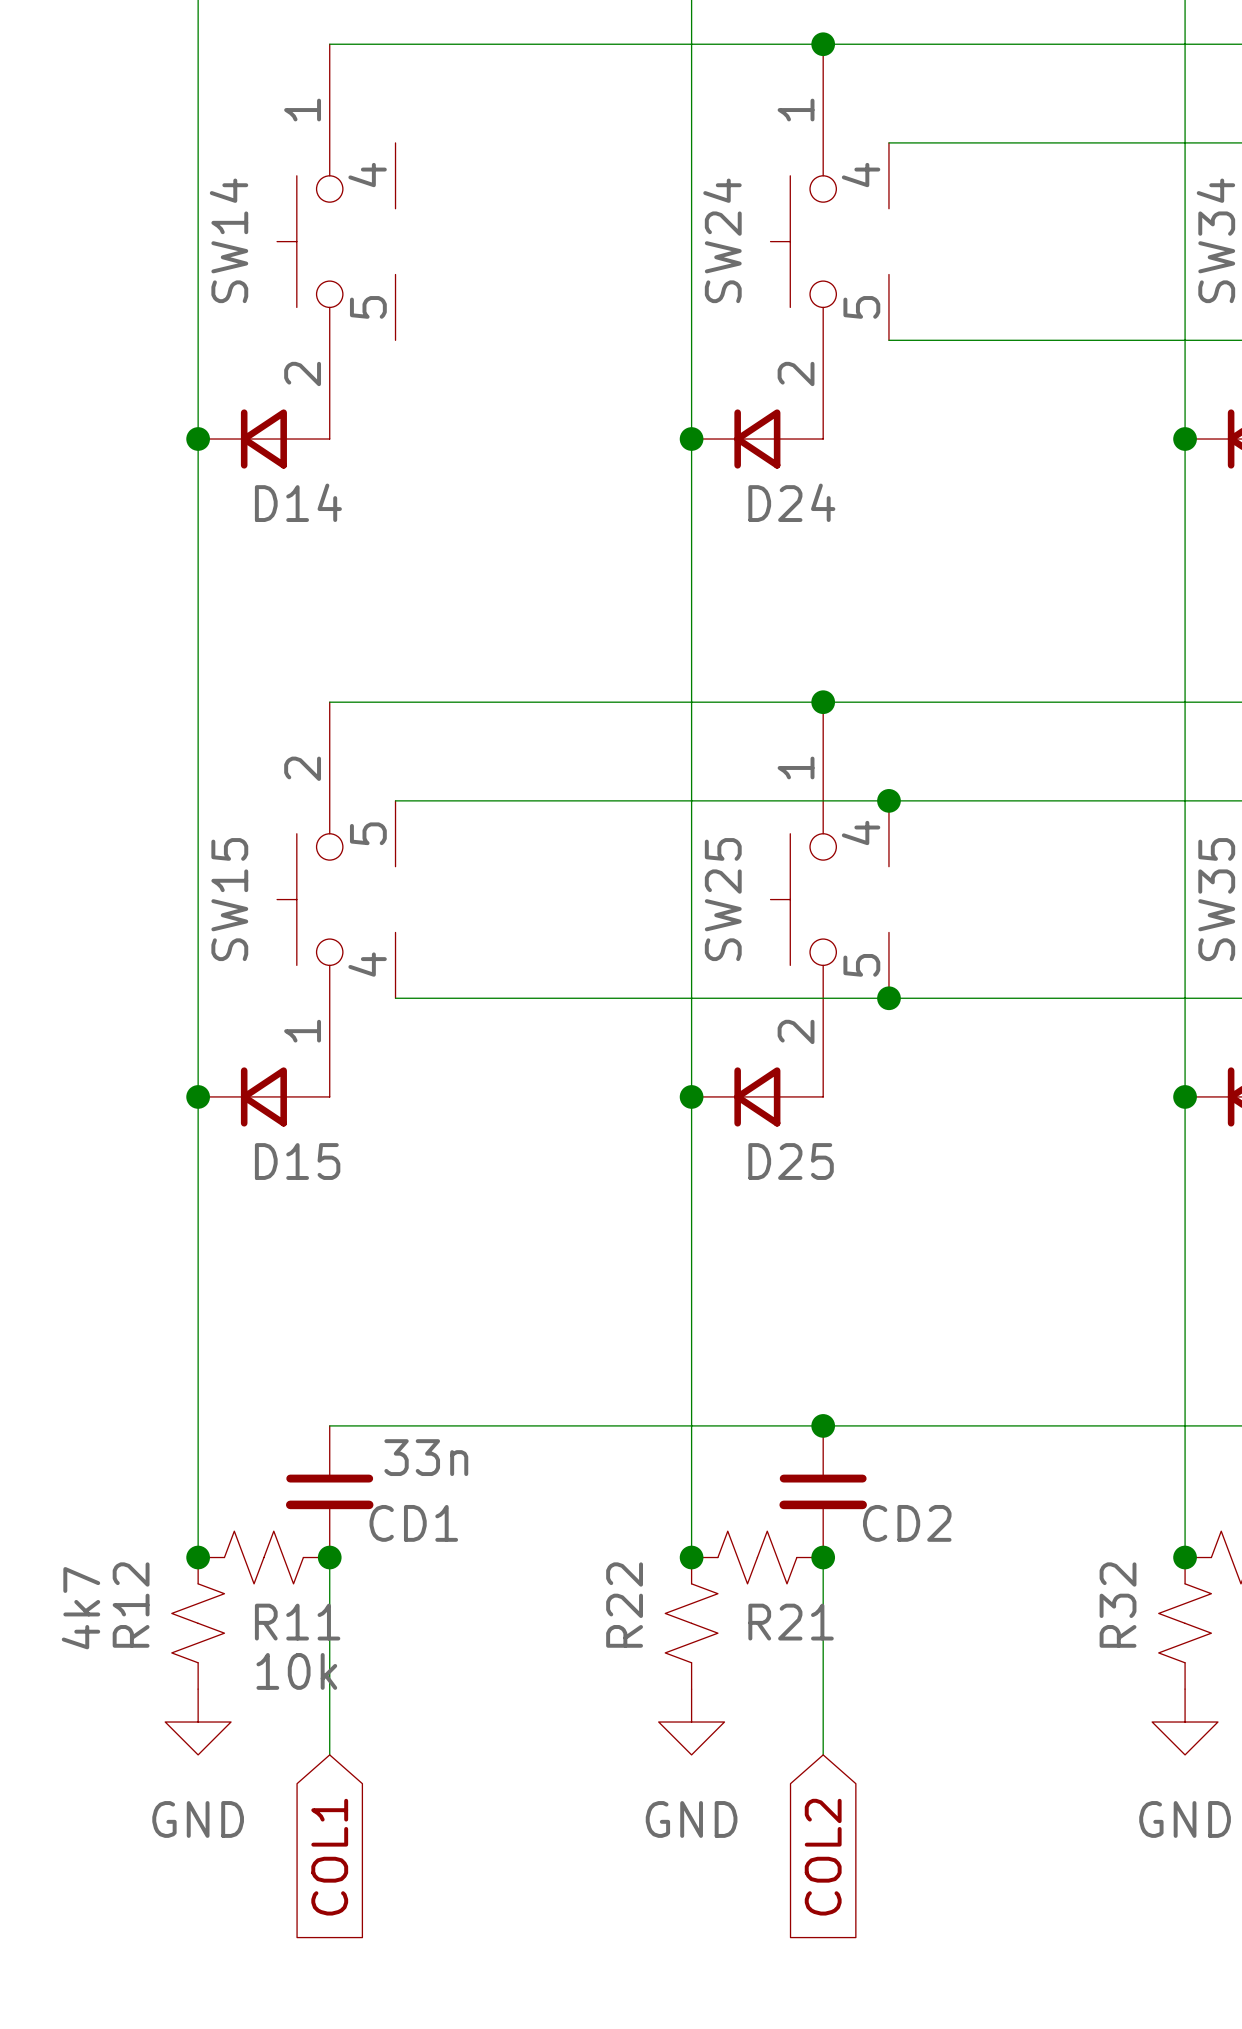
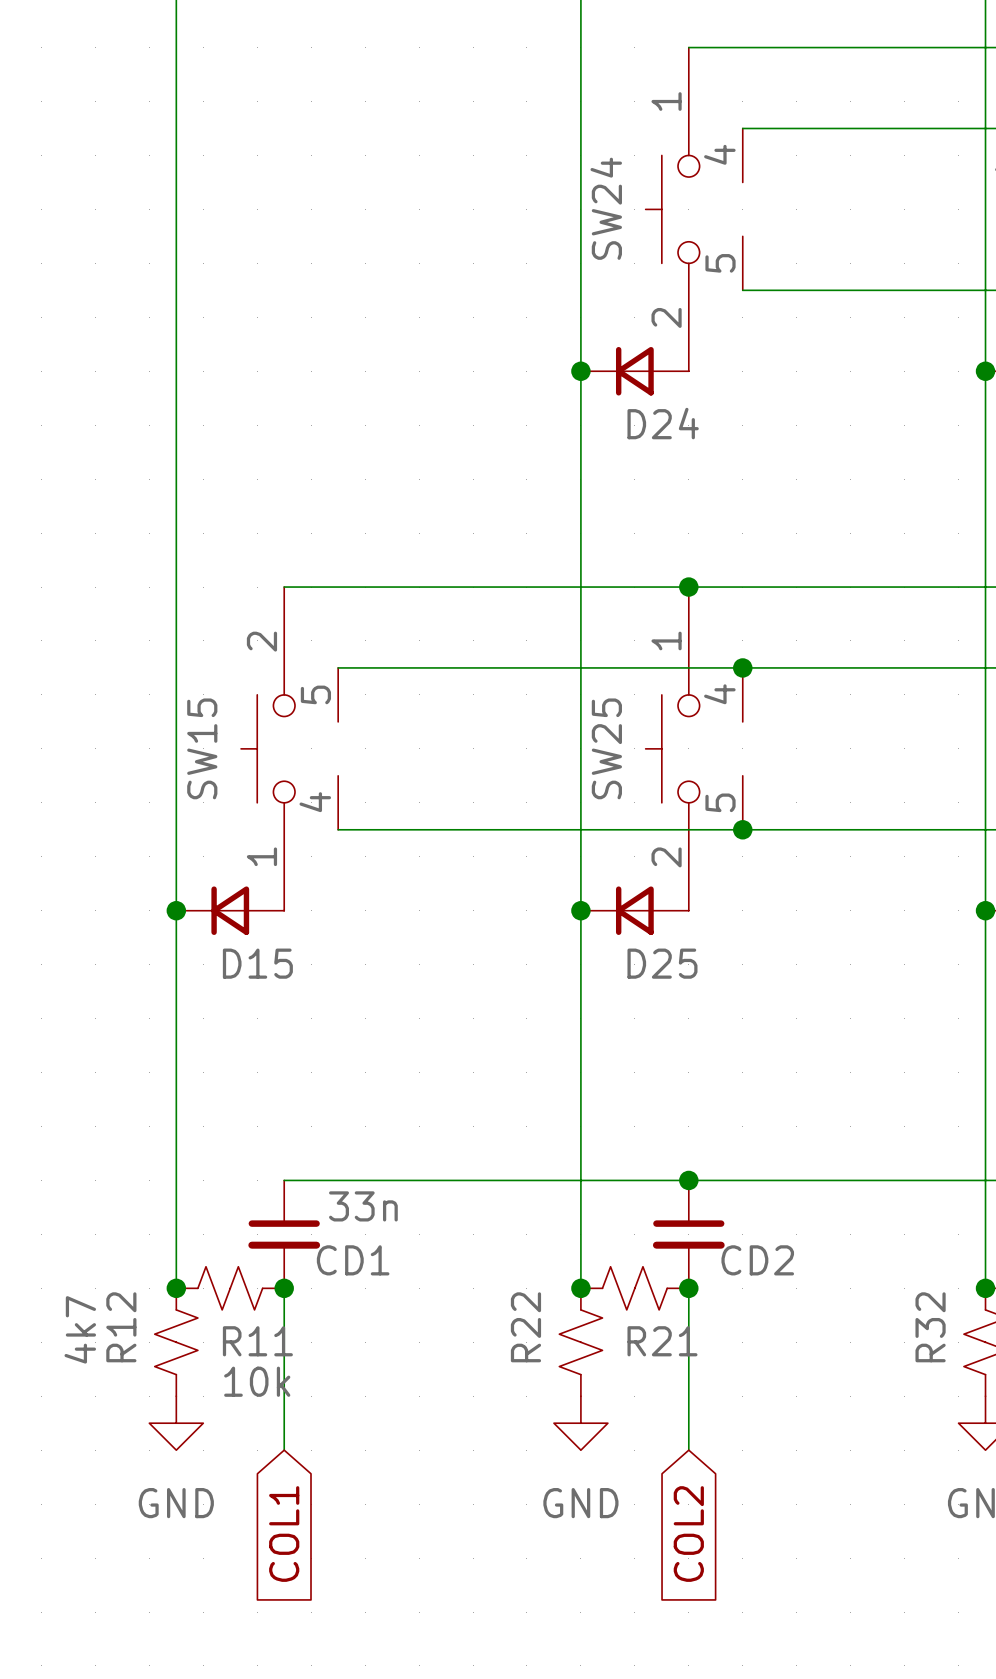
wire: (329, 44) (823, 44) -> none
junction: (823, 44) -> none
SW14: (336, 241) -> none
junction: (198, 439) -> none
D14: (263, 439) -> none

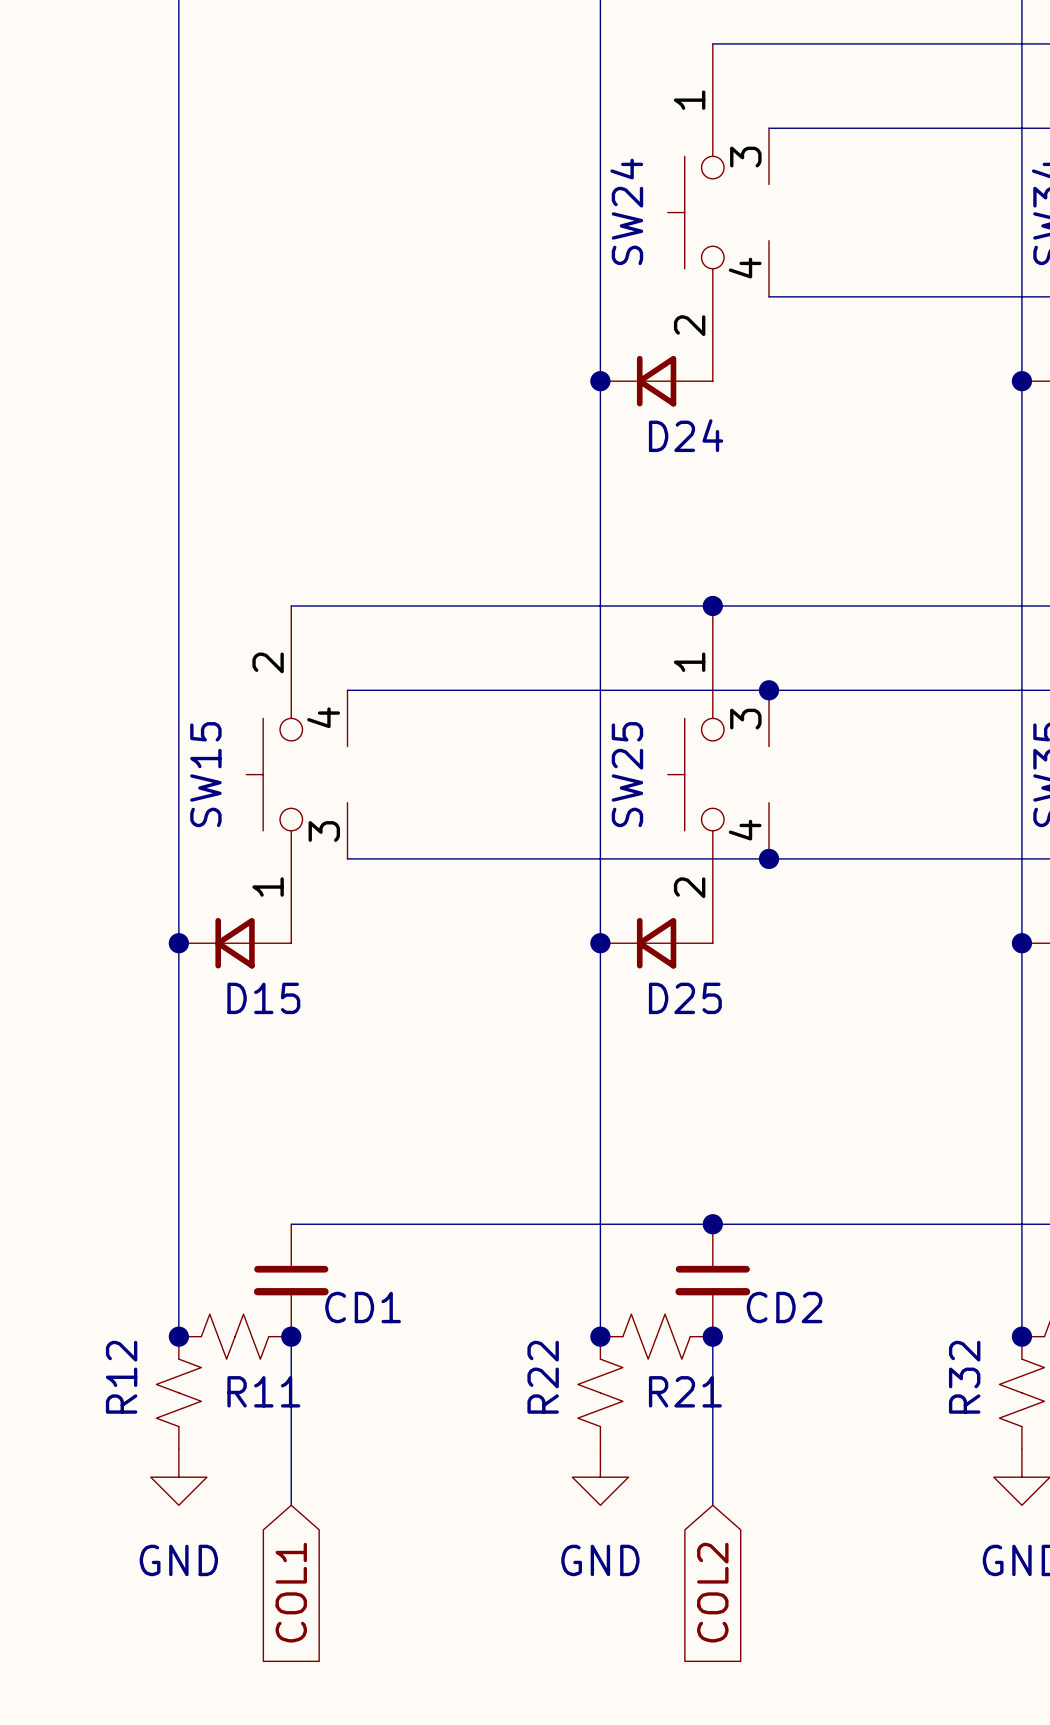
SW24 pin number: 4 (719, 154) -> 3 (745, 157)
SW24 pin number: 5 (720, 263) -> 4 (745, 268)
SW15 pin number: 5 (315, 694) -> 4 (323, 717)
SW25 pin number: 4 (719, 694) -> 3 (745, 719)
SW15 pin number: 4 (315, 802) -> 3 (324, 831)
SW25 pin number: 5 (720, 802) -> 4 (745, 830)
CD1 value: 33n (363, 1206) -> none
R12 value: 4k7 (80, 1329) -> none
R11 value: 10k (257, 1381) -> none

